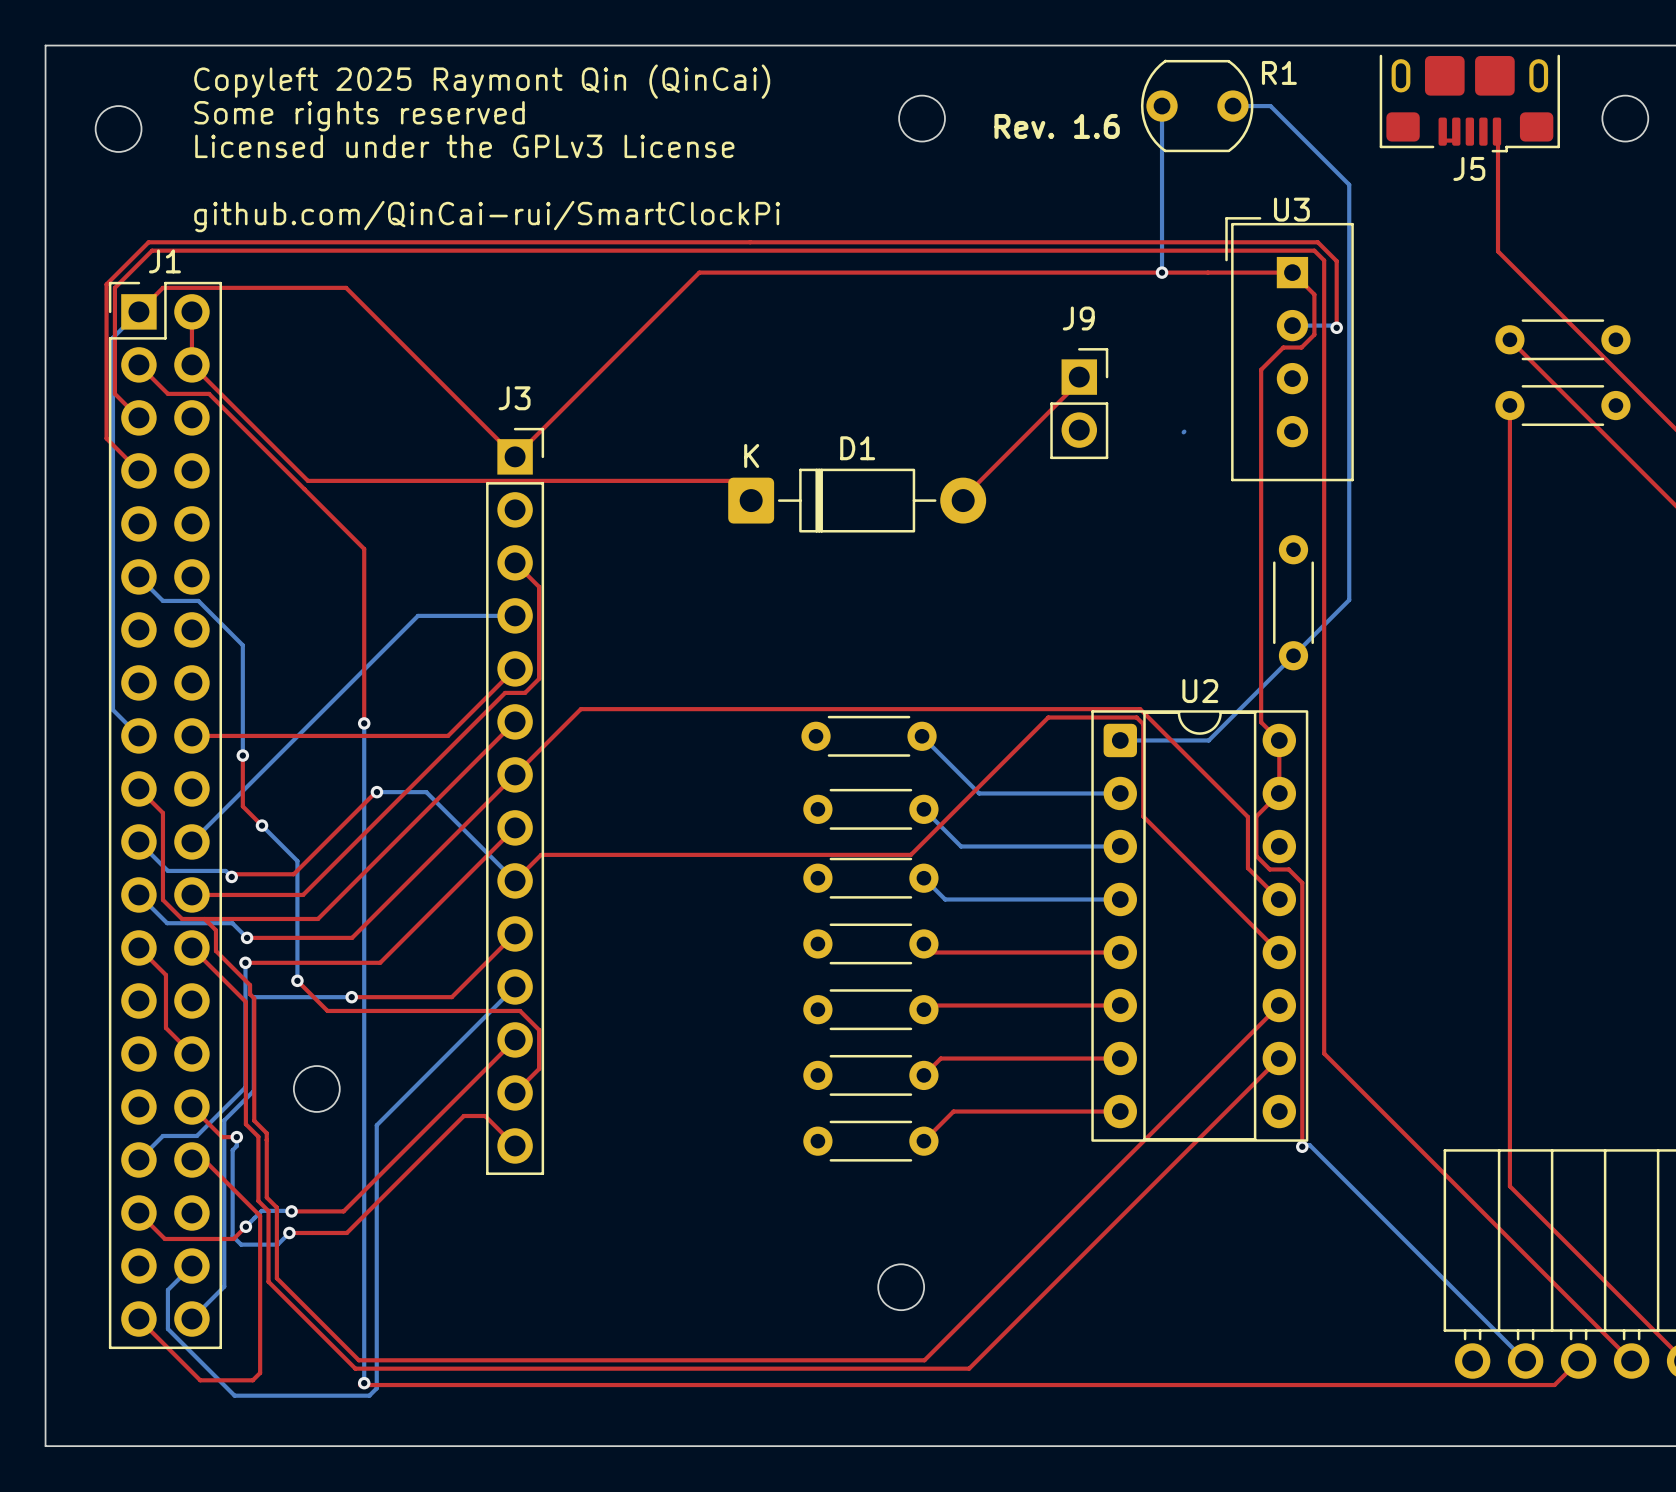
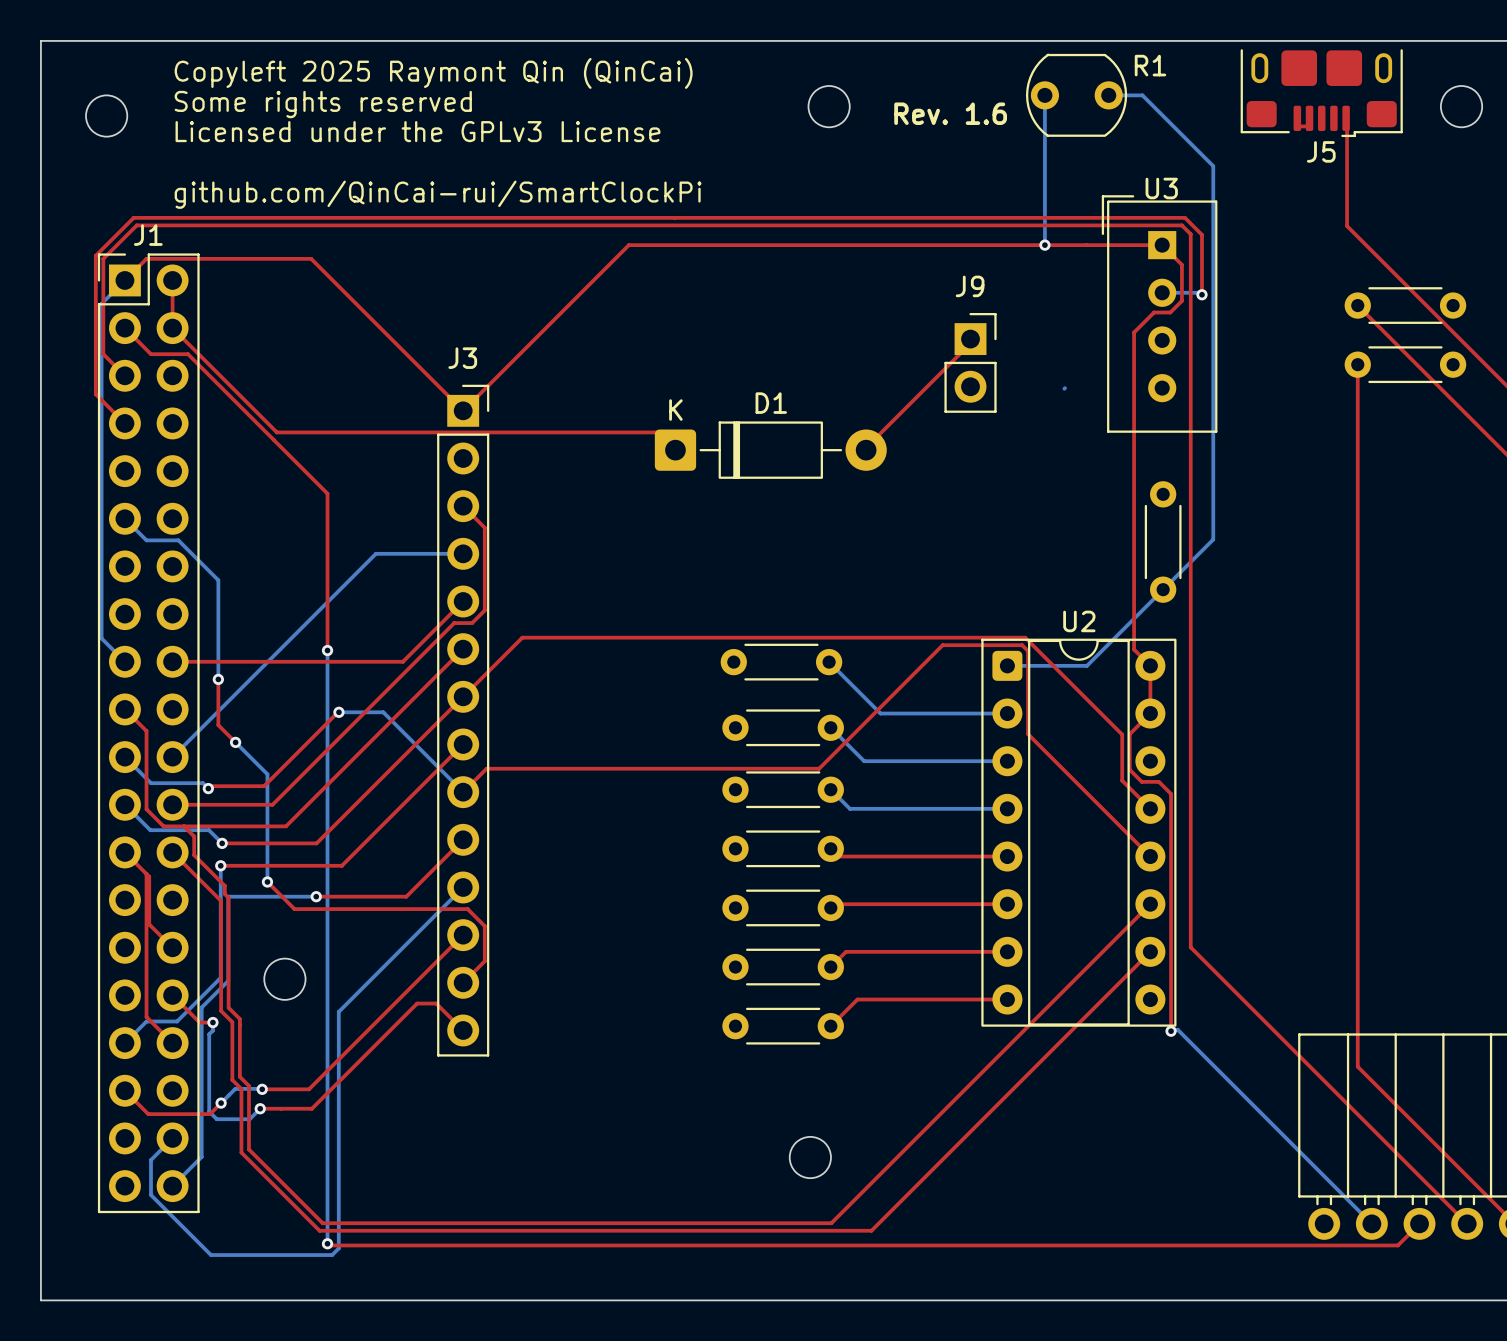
top track: none -> (146, 874) (146, 1017) (172, 1043)
top track: (204, 1159) (260, 1215) (260, 1372) (252, 1380) (200, 1380) (138, 1319) -> none

